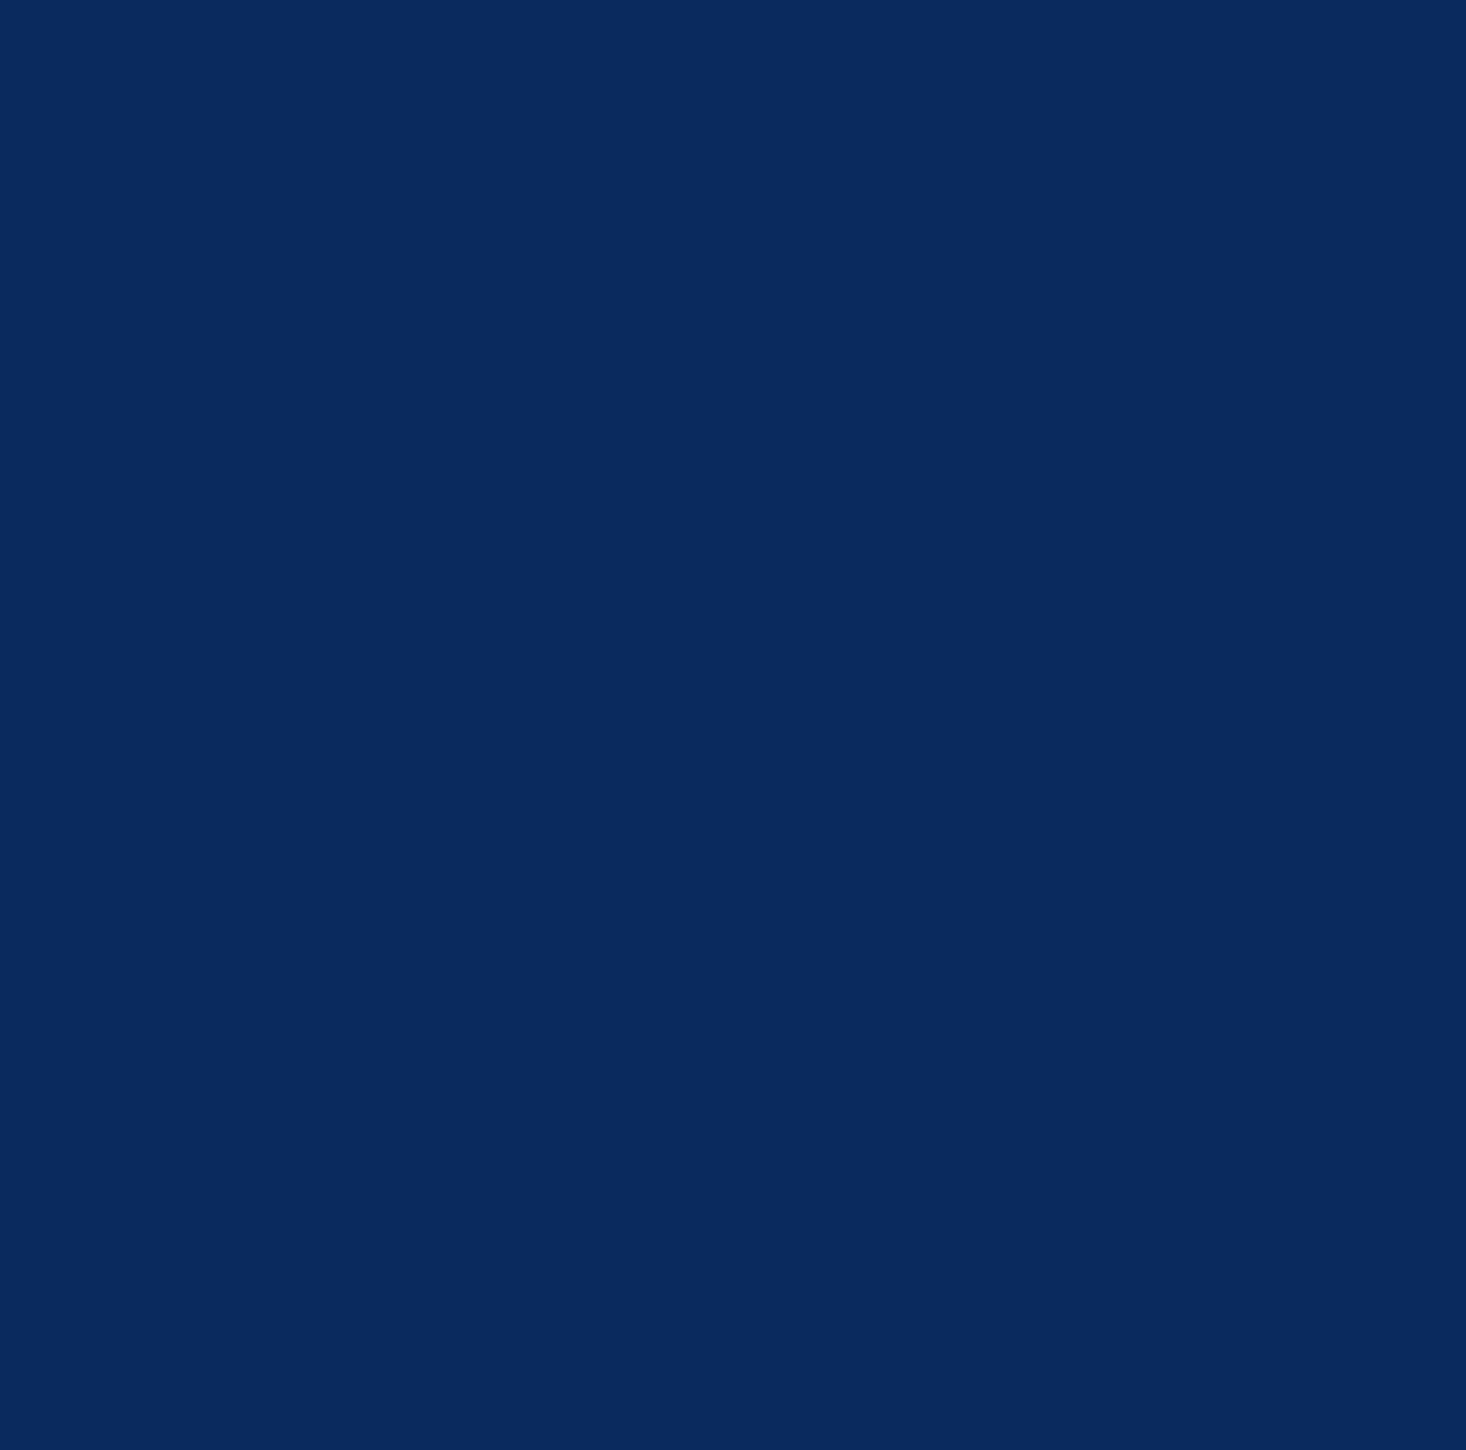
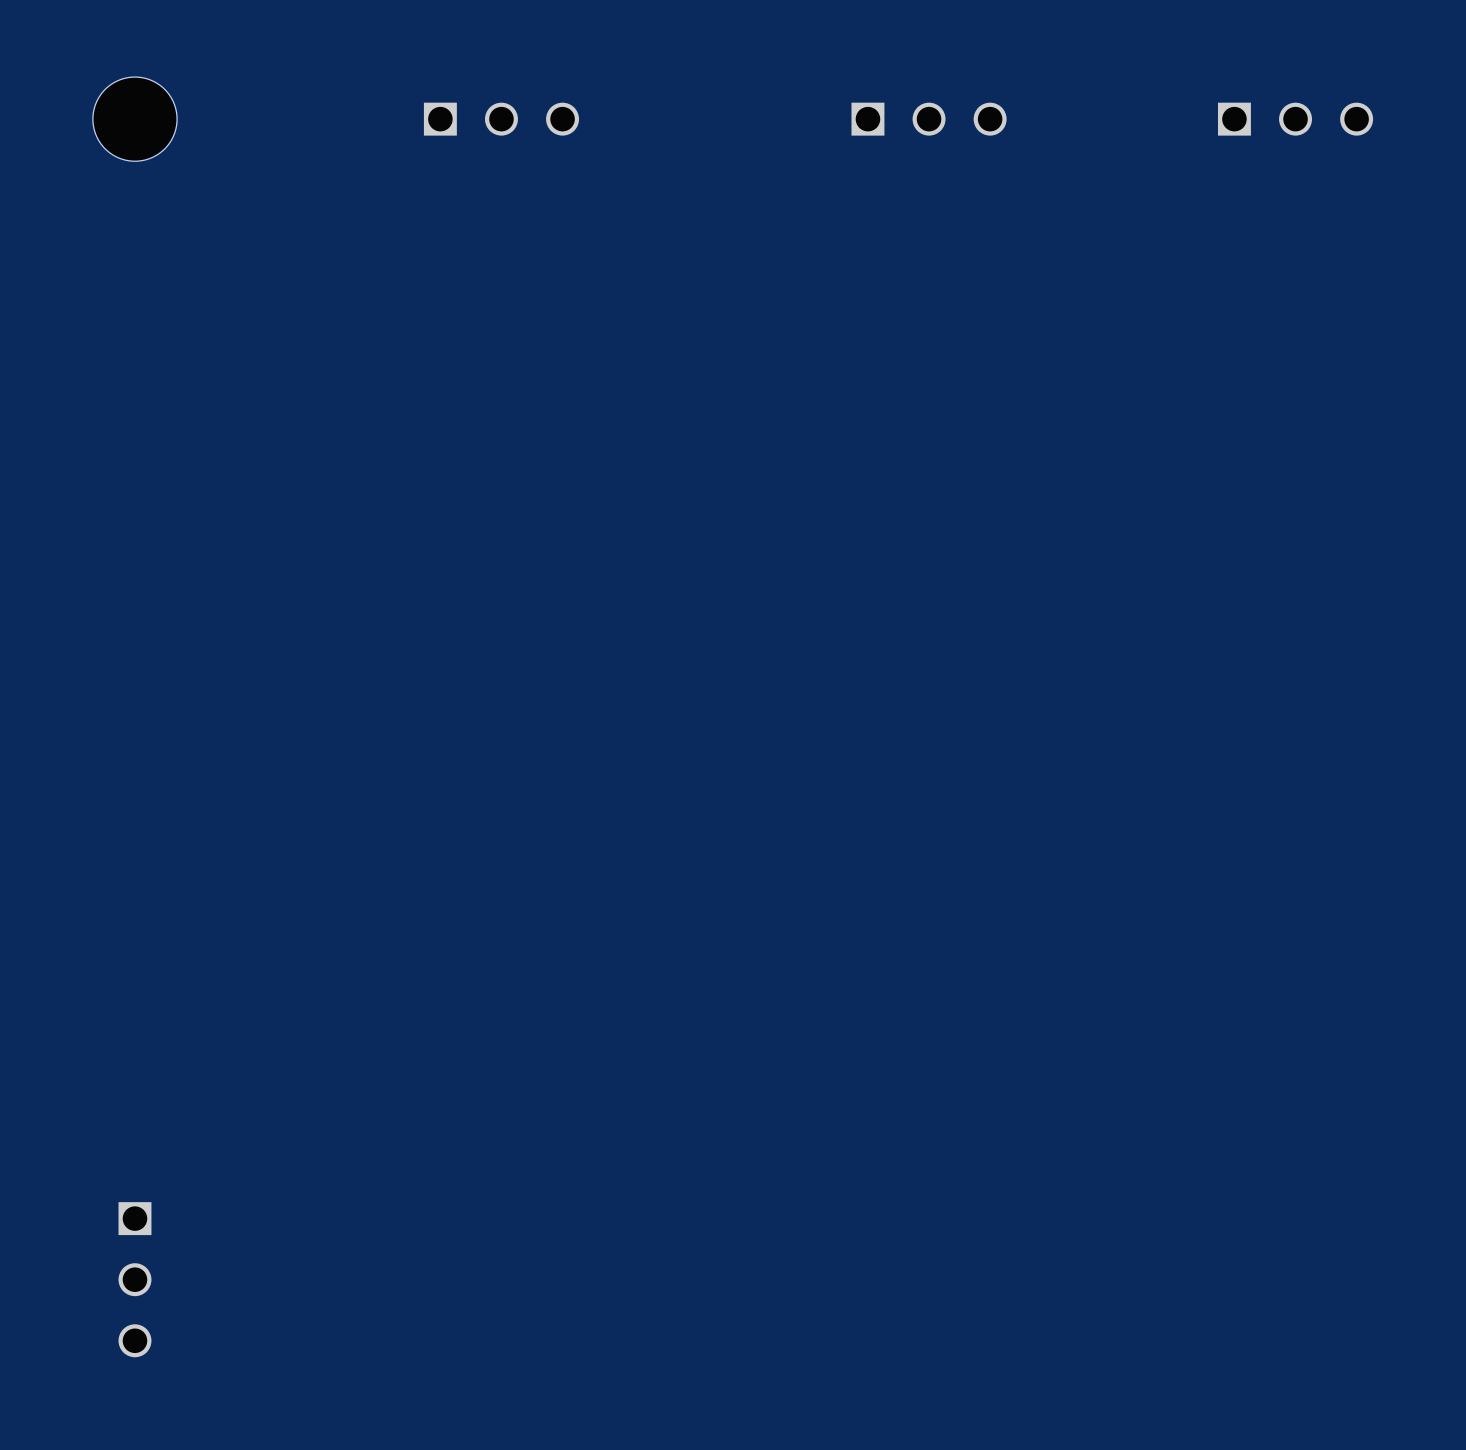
part: none -> (134, 119)
part: none -> (501, 119)
part: none -> (929, 119)
part: none -> (1295, 119)
part: none -> (134, 1279)

